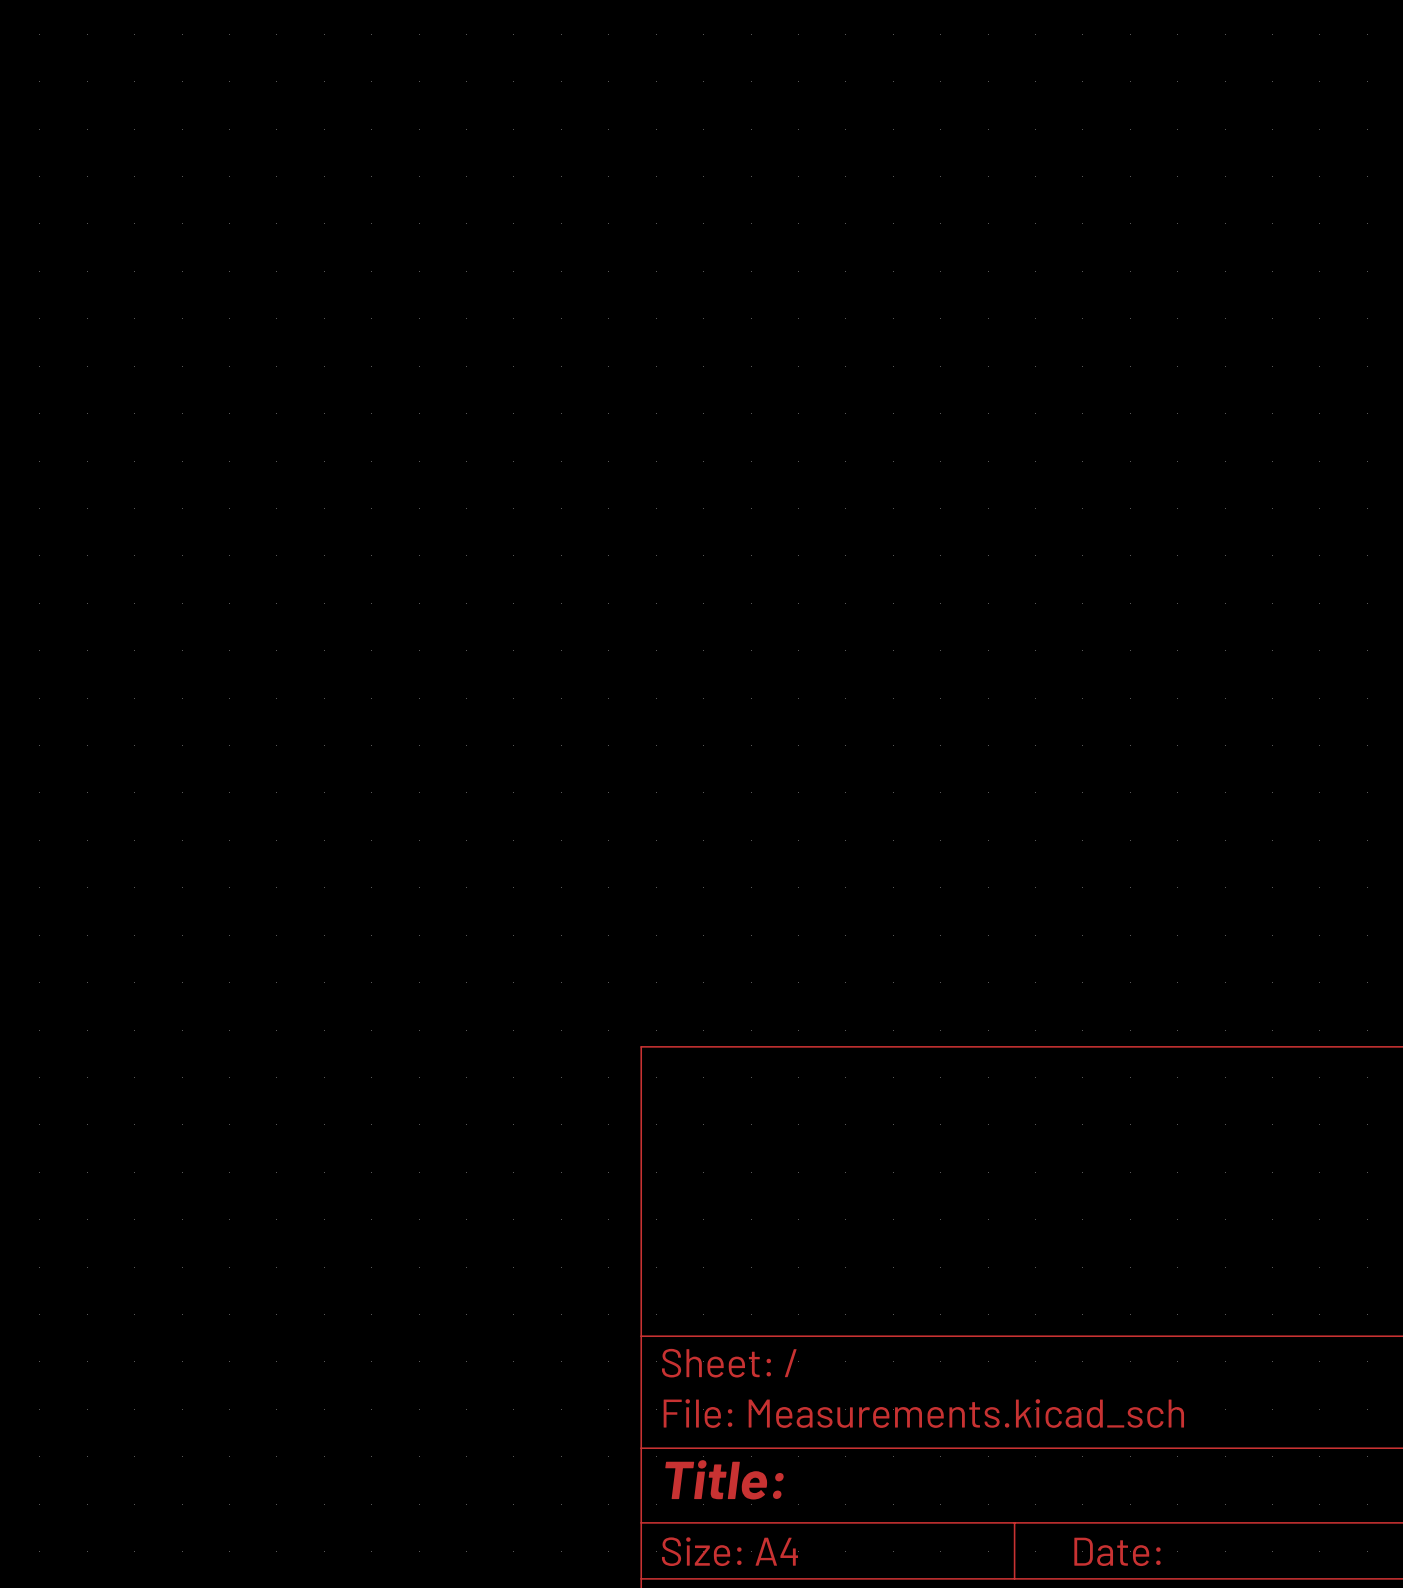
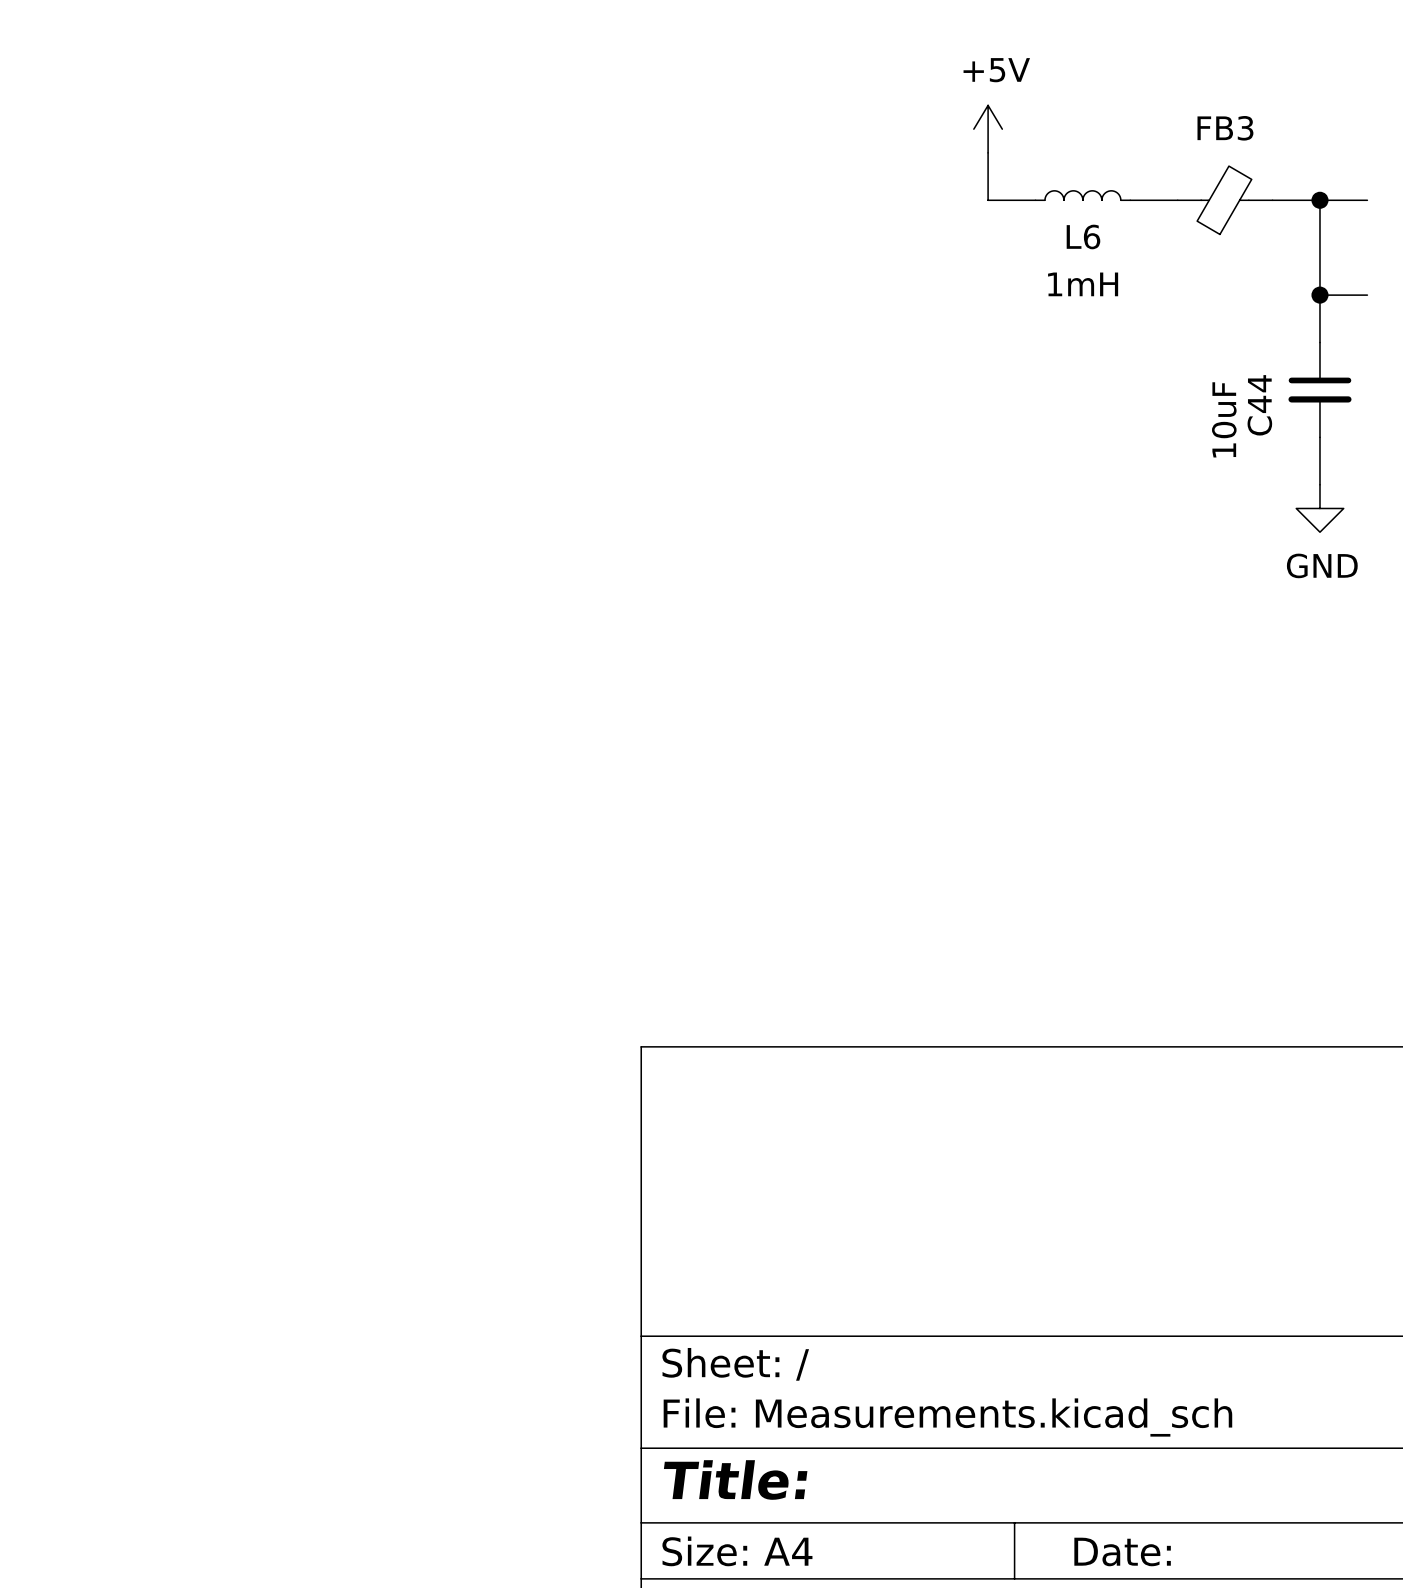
power symbol: none -> +5V (988, 129)
wire: none -> (988, 152) (988, 200) (1035, 200)
L6: none -> 1mH (1082, 195)
wire: none -> (1130, 200) (1177, 200)
FB3: none -> (1225, 200)
wire: none -> (1272, 200) (1367, 200)
wire: none -> (1319, 200) (1319, 342)
junction: none -> (1319, 200)
wire: none -> (1319, 295) (1367, 295)
junction: none -> (1319, 295)
C44: none -> 10uF (1319, 389)
wire: none -> (1319, 437) (1319, 484)
power symbol: none -> GND (1319, 508)

